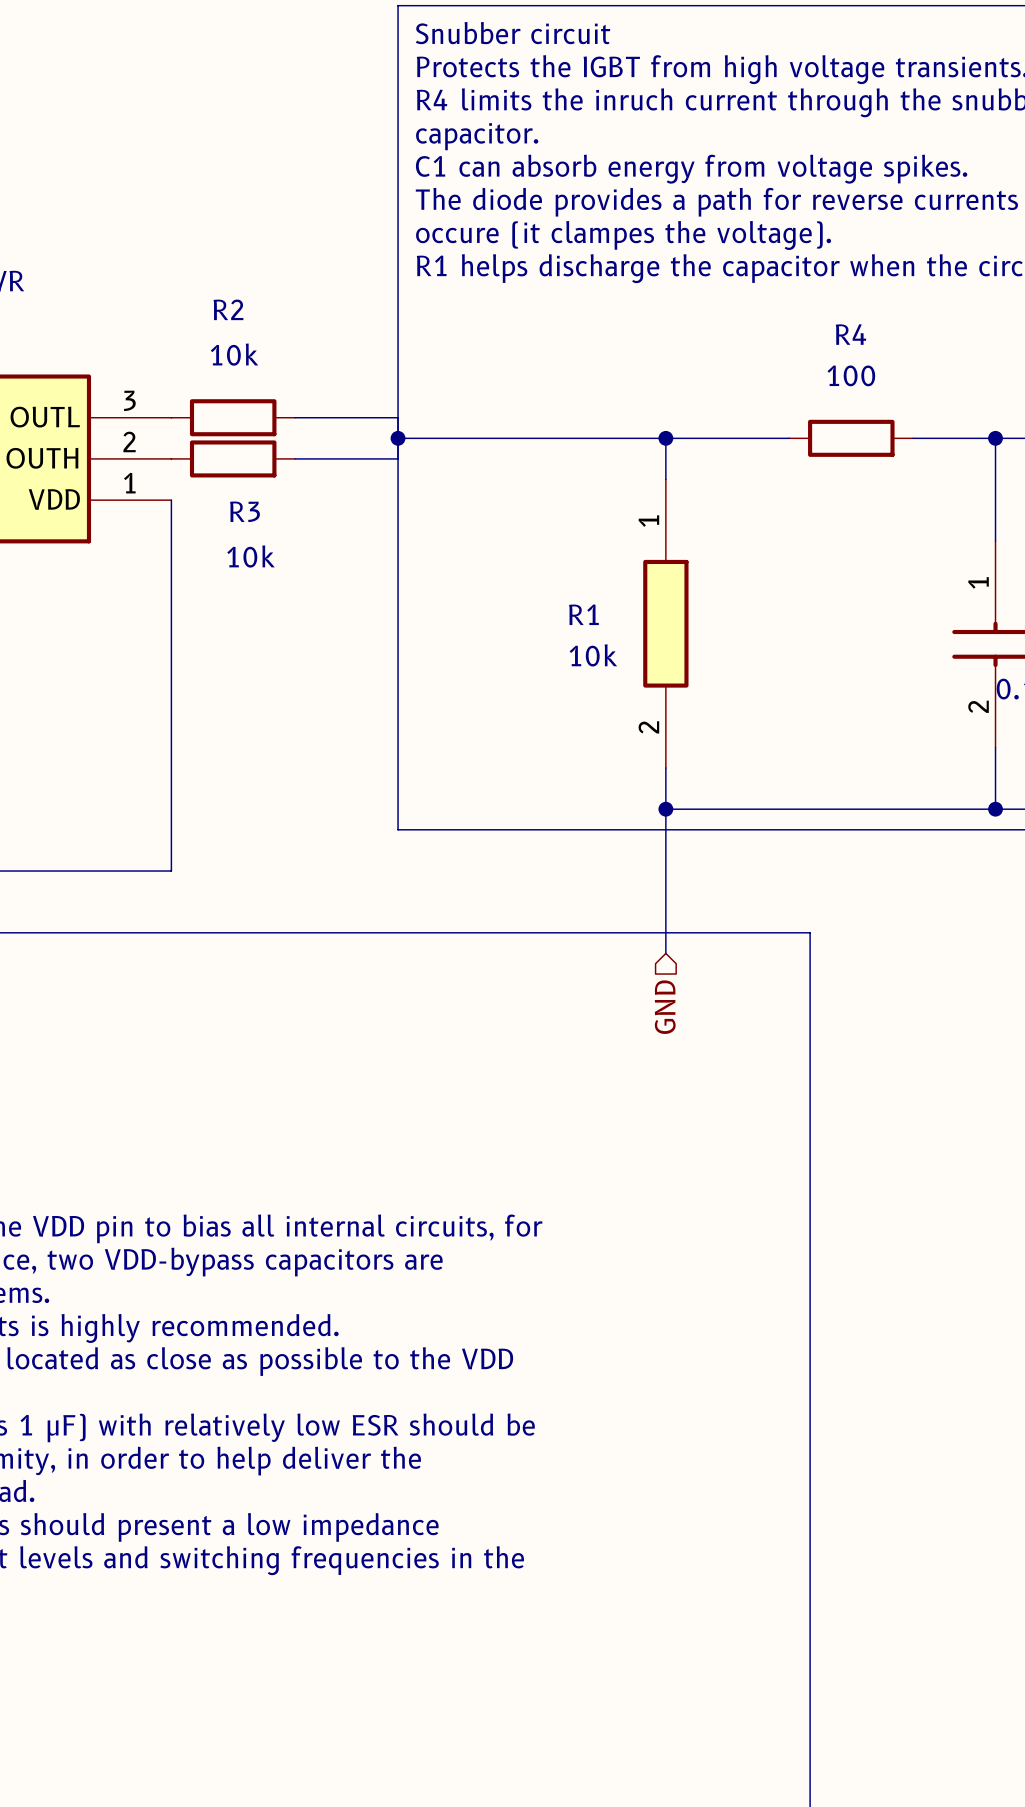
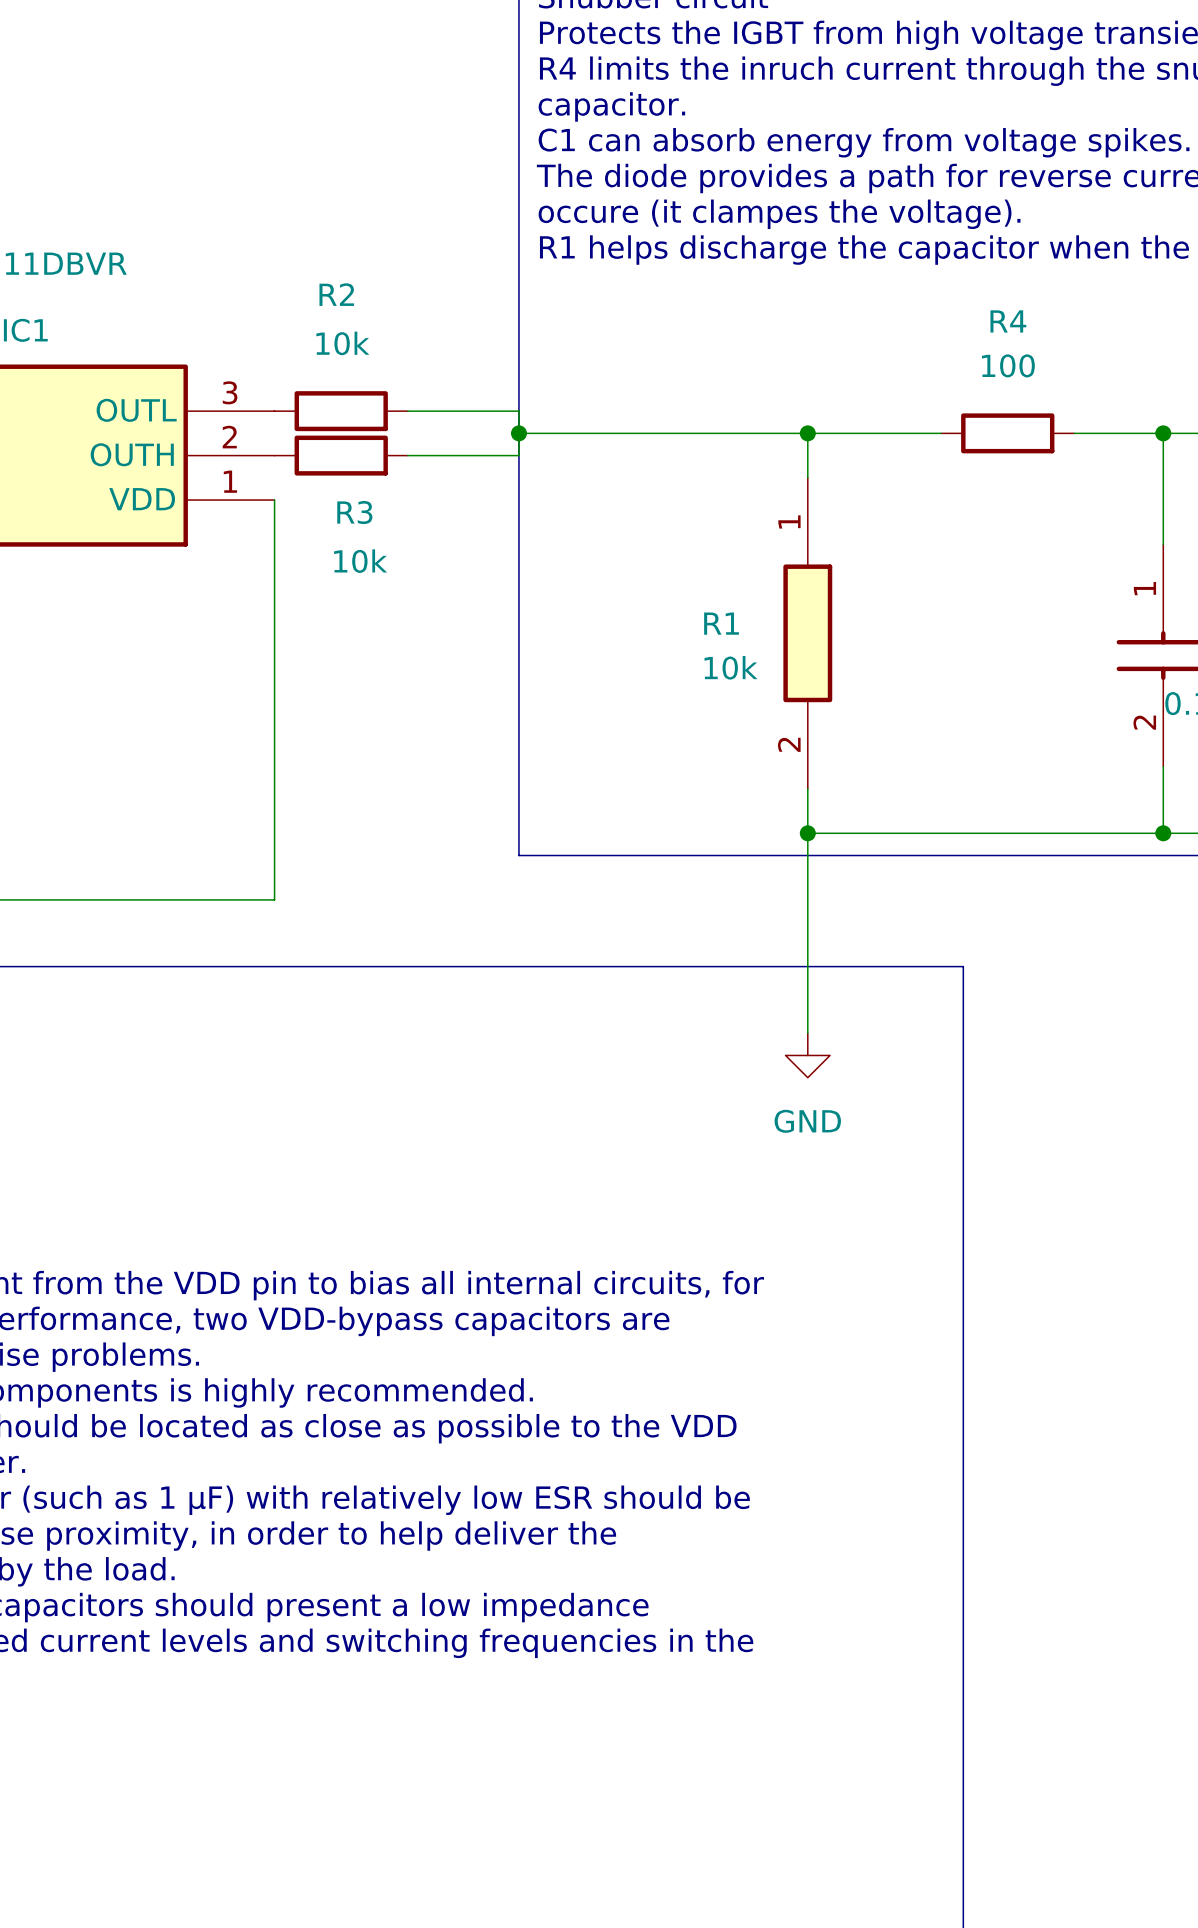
wire: none -> (807, 988) (807, 1033)
hierarchical label: GND (665, 1007) -> none
power symbol: none -> GND (807, 1055)

